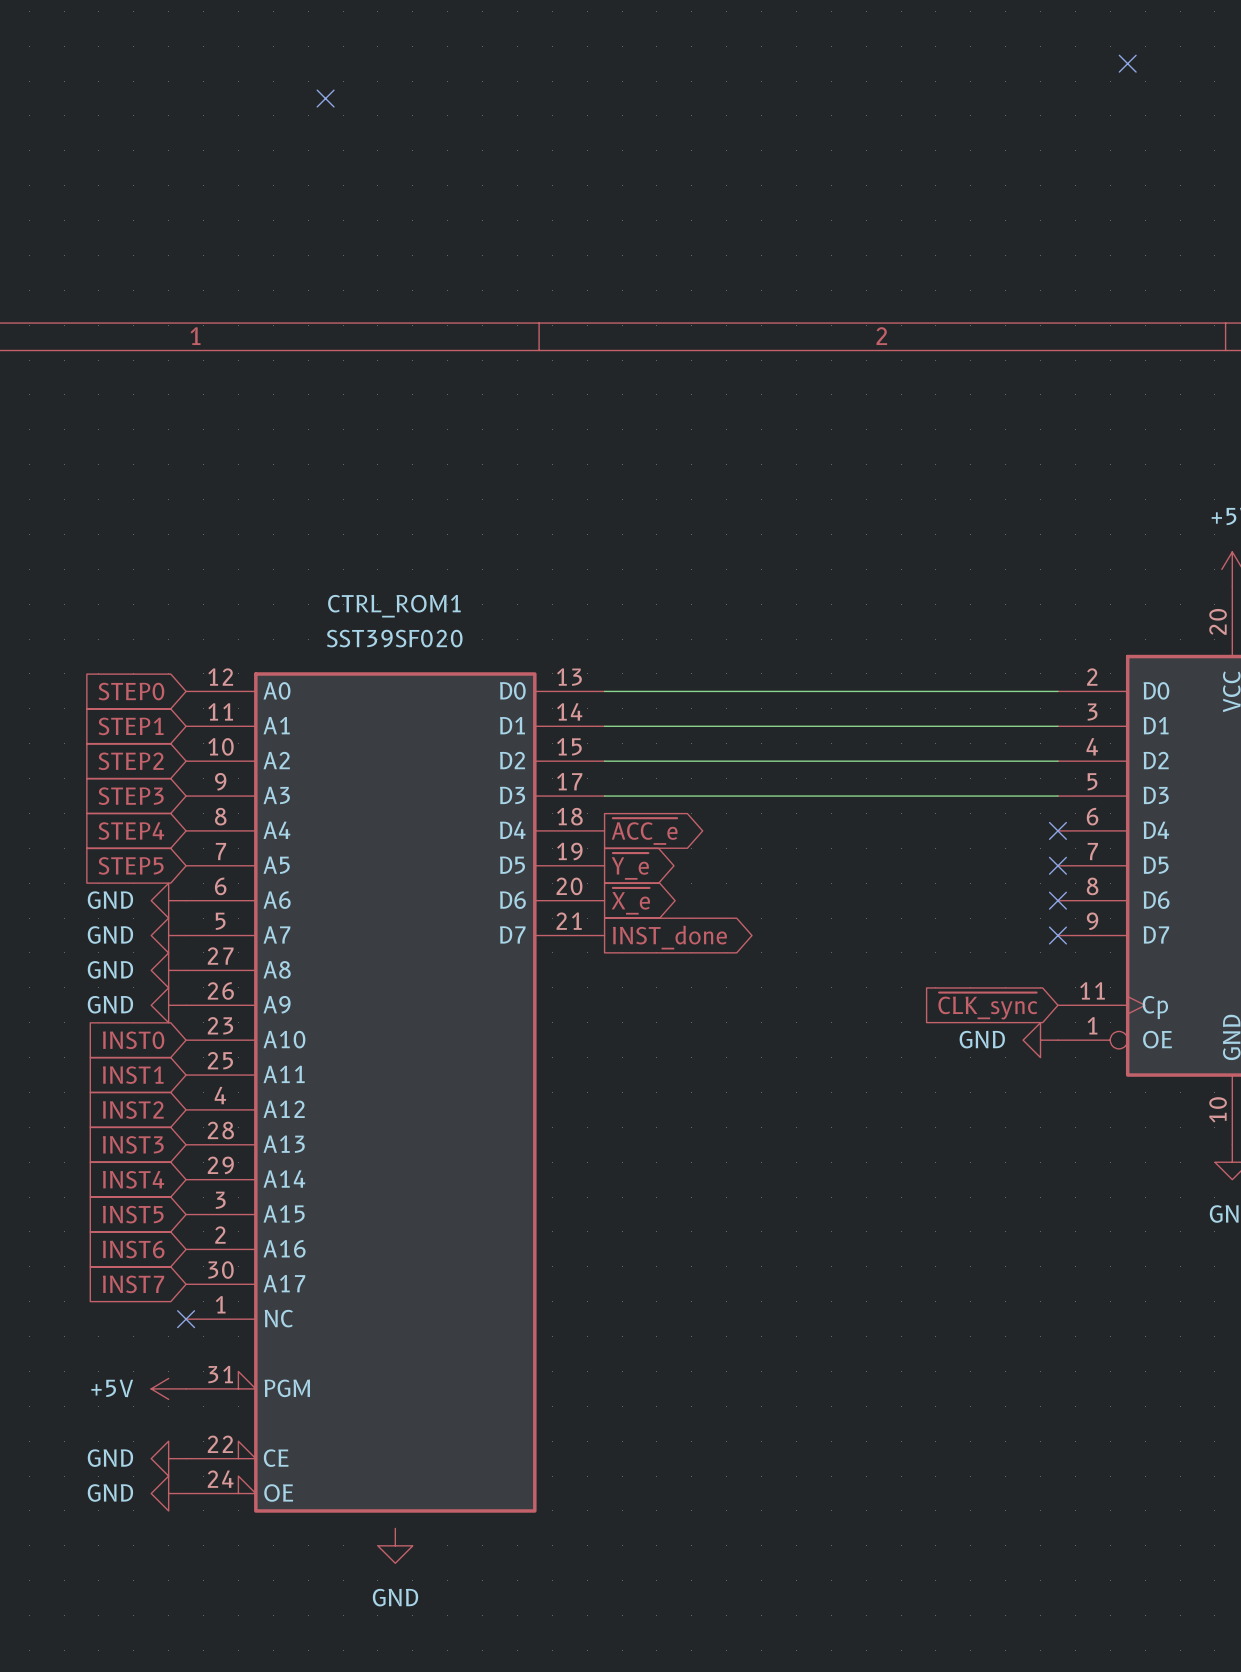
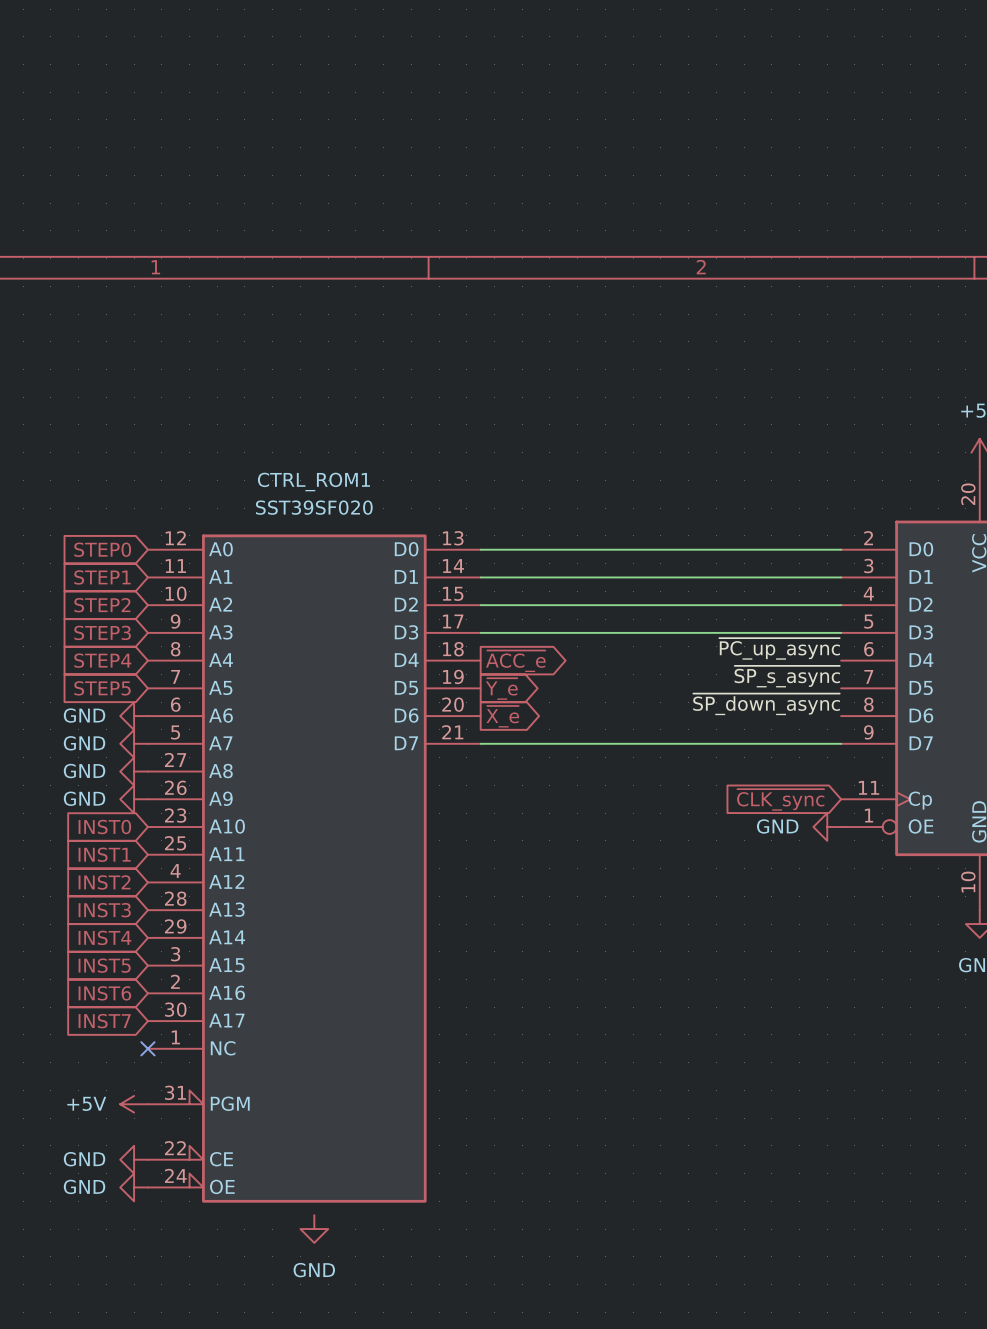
no-connect mark: (1127, 63) -> none
no-connect mark: (325, 98) -> none
label: none -> ~{PC_up_async} (779, 648)
no-connect mark: (1057, 830) -> none
label: none -> ~{SP_s_async} (787, 676)
no-connect mark: (1057, 865) -> none
label: none -> ~{SP_down_async} (766, 704)
no-connect mark: (1057, 900) -> none
wire: none -> (480, 743) (841, 743)
no-connect mark: (1057, 935) -> none
global label: INST_done (669, 937) -> none

